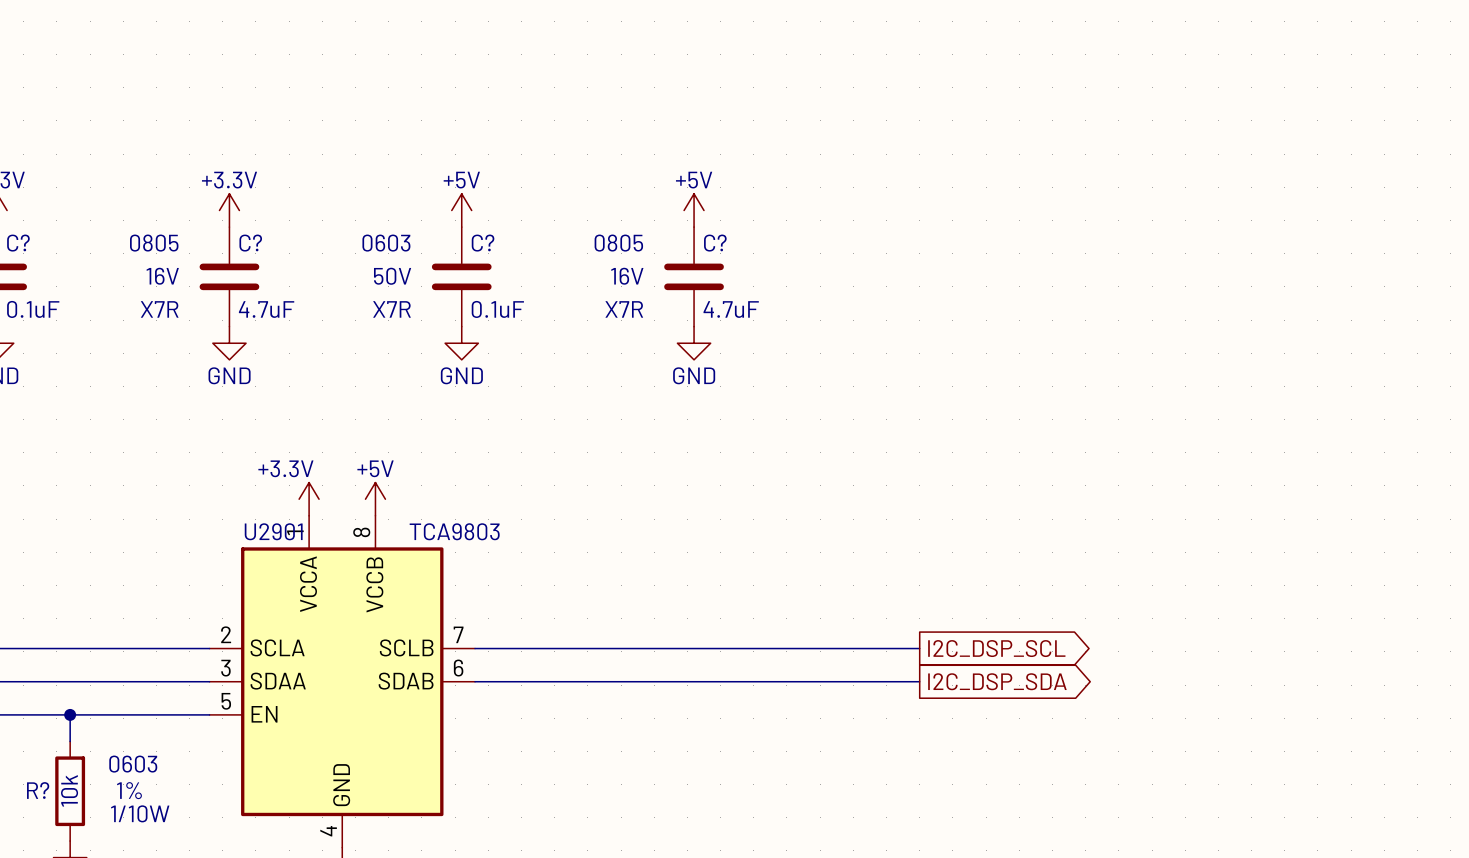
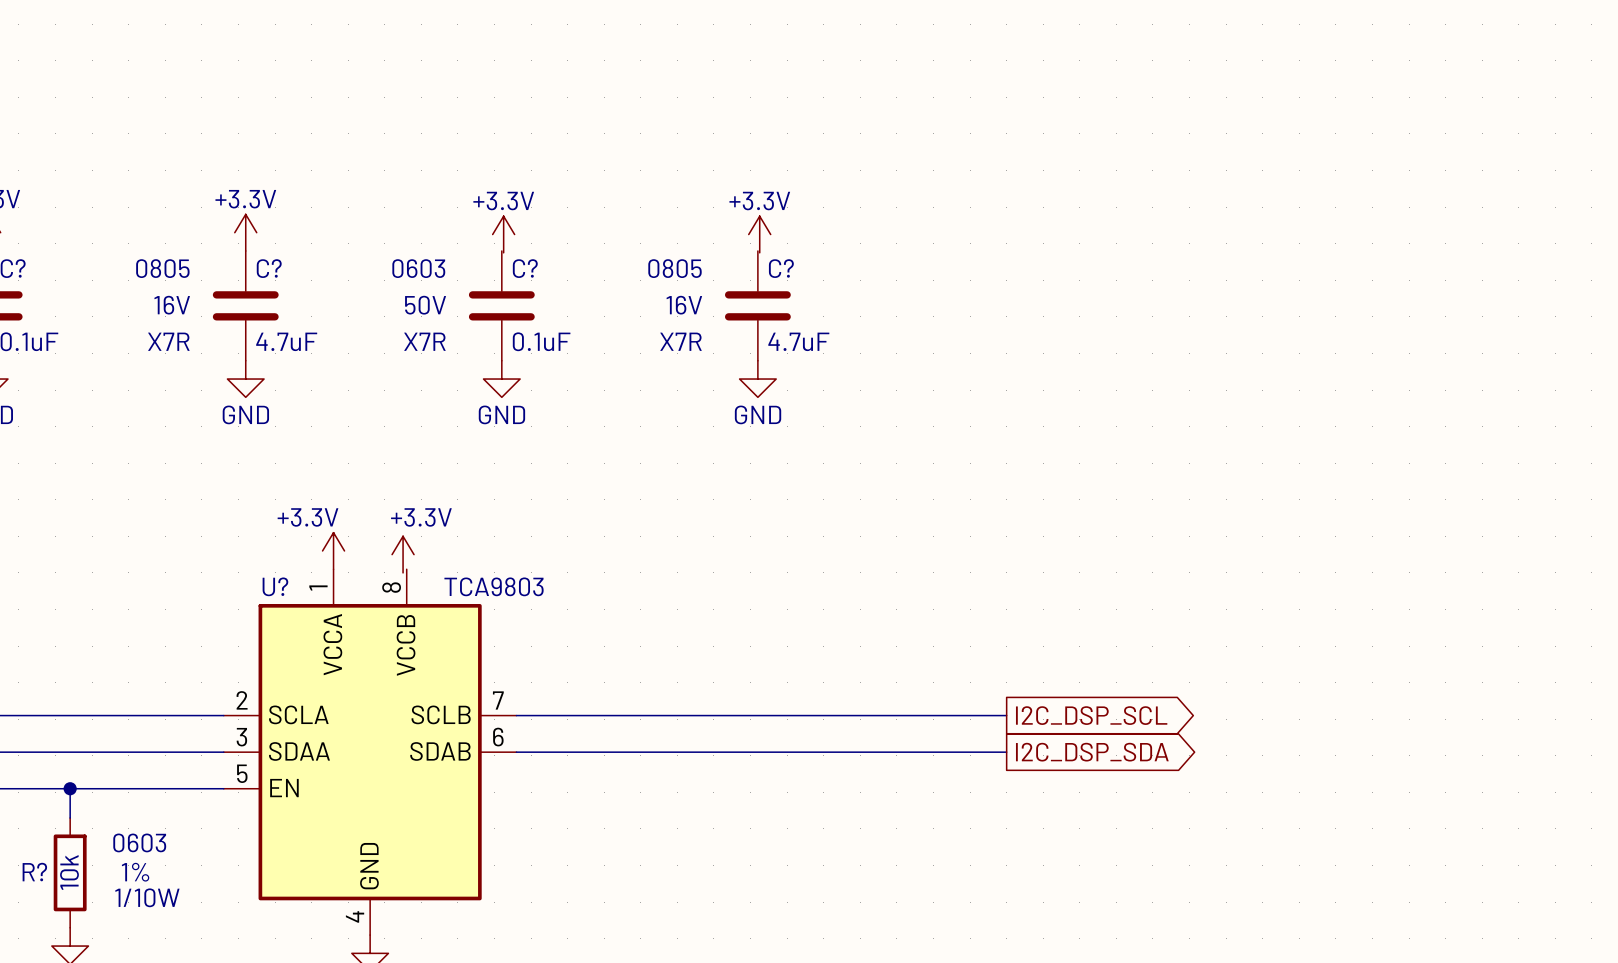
power symbol: +5V (461, 210) -> +3.3V (503, 234)
power symbol: +5V (694, 210) -> +3.3V (759, 234)
power symbol: +5V (375, 499) -> +3.3V (403, 554)
U2901 name: U2901 (273, 531) -> U? (275, 586)

